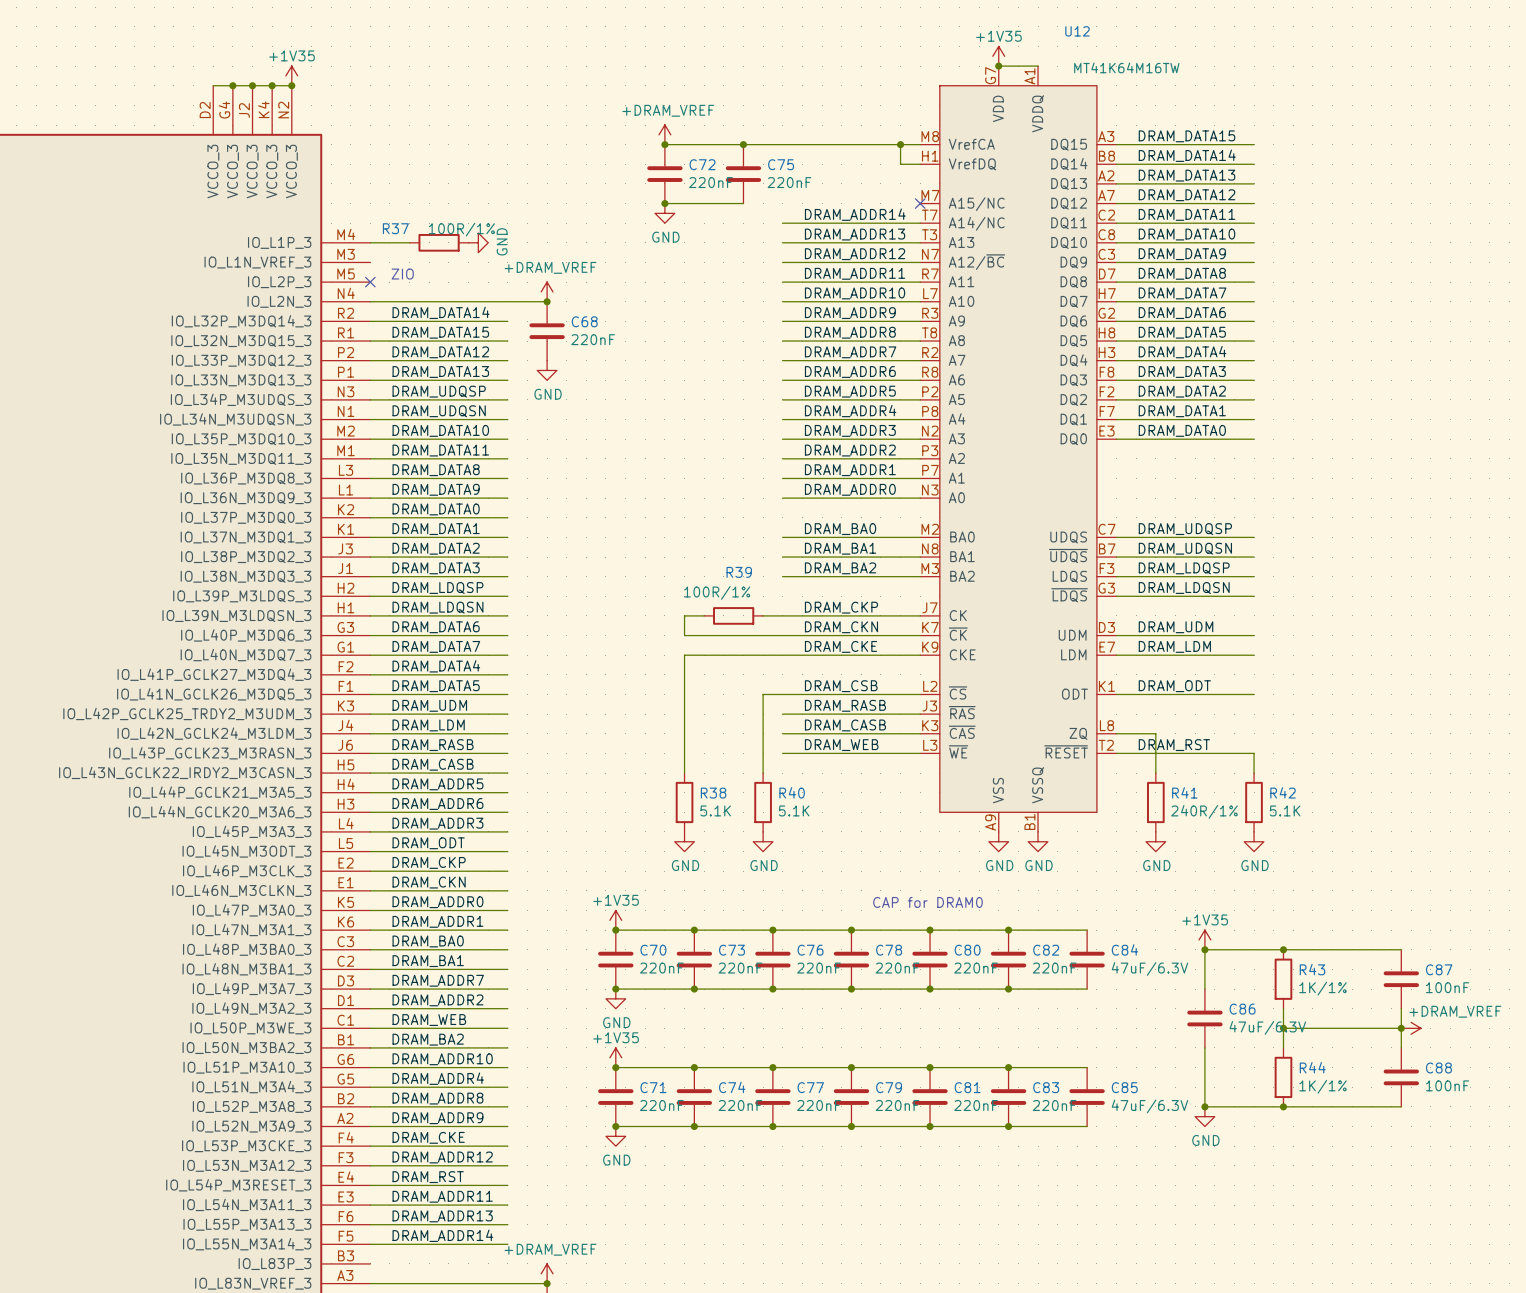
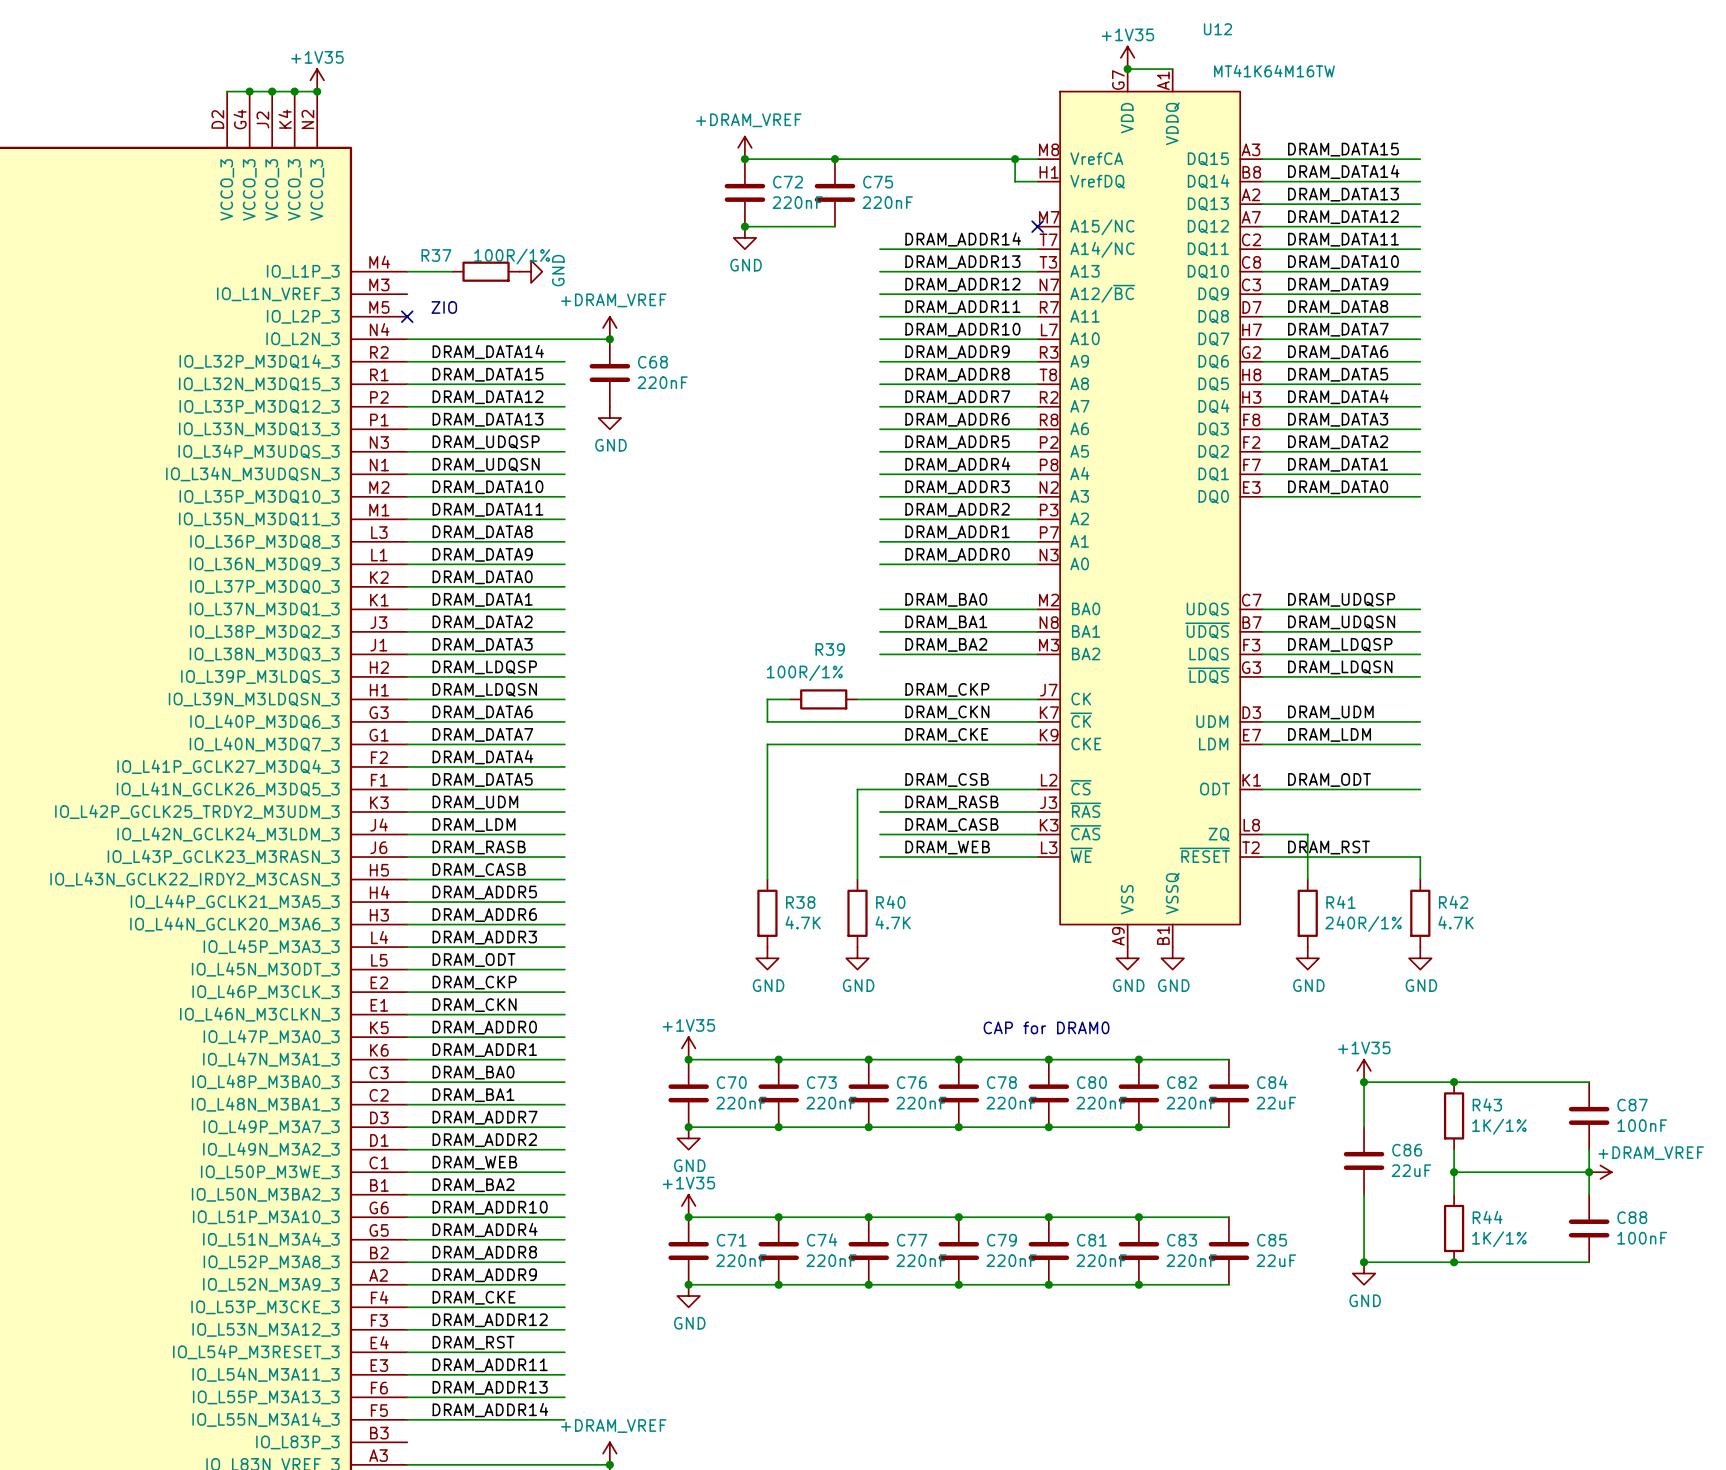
R38 value: 5.1K (715, 810) -> 4.7K (803, 922)
R40 value: 5.1K (794, 810) -> 4.7K (893, 922)
R42 value: 5.1K (1285, 810) -> 4.7K (1455, 922)
C84 value: 47uF/6.3V (1149, 968) -> 22uF (1276, 1103)
C86 value: 47uF/6.3V (1267, 1027) -> 22uF (1411, 1170)
C85 value: 47uF/6.3V (1149, 1106) -> 22uF (1276, 1260)

